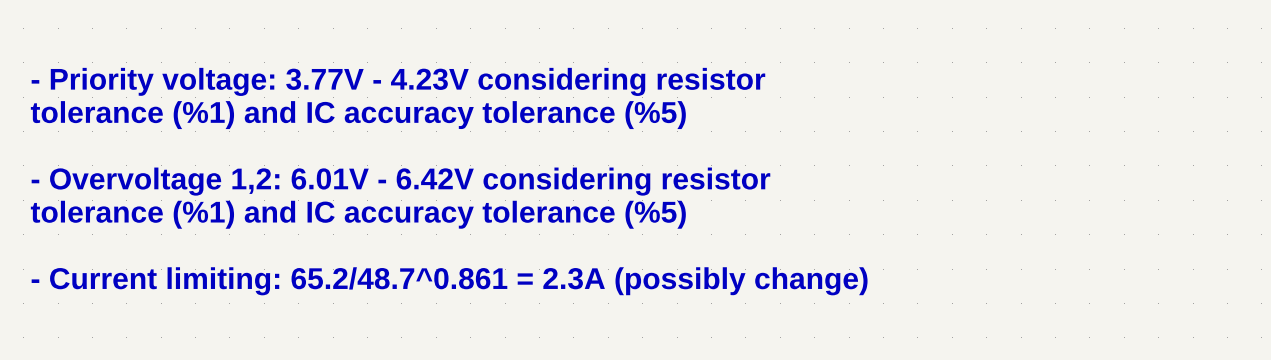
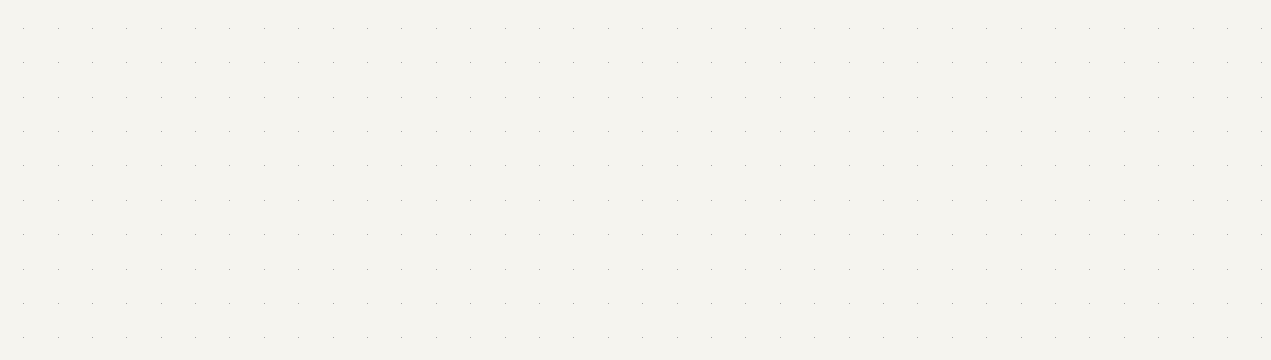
text: - Priority voltage: 3.77V - 4.23V considering resistor (398, 81) -> none
text: tolerance (%1) and IC accuracy tolerance (%5) (358, 115) -> none
text: - Overvoltage 1,2: 6.01V - 6.42V considering resistor (400, 181) -> none
text: tolerance (%1) and IC accuracy tolerance (%5) (358, 214) -> none
text: - Current limiting: 65.2/48.7^0.861 = 2.3A (possibly change) (449, 281) -> none

